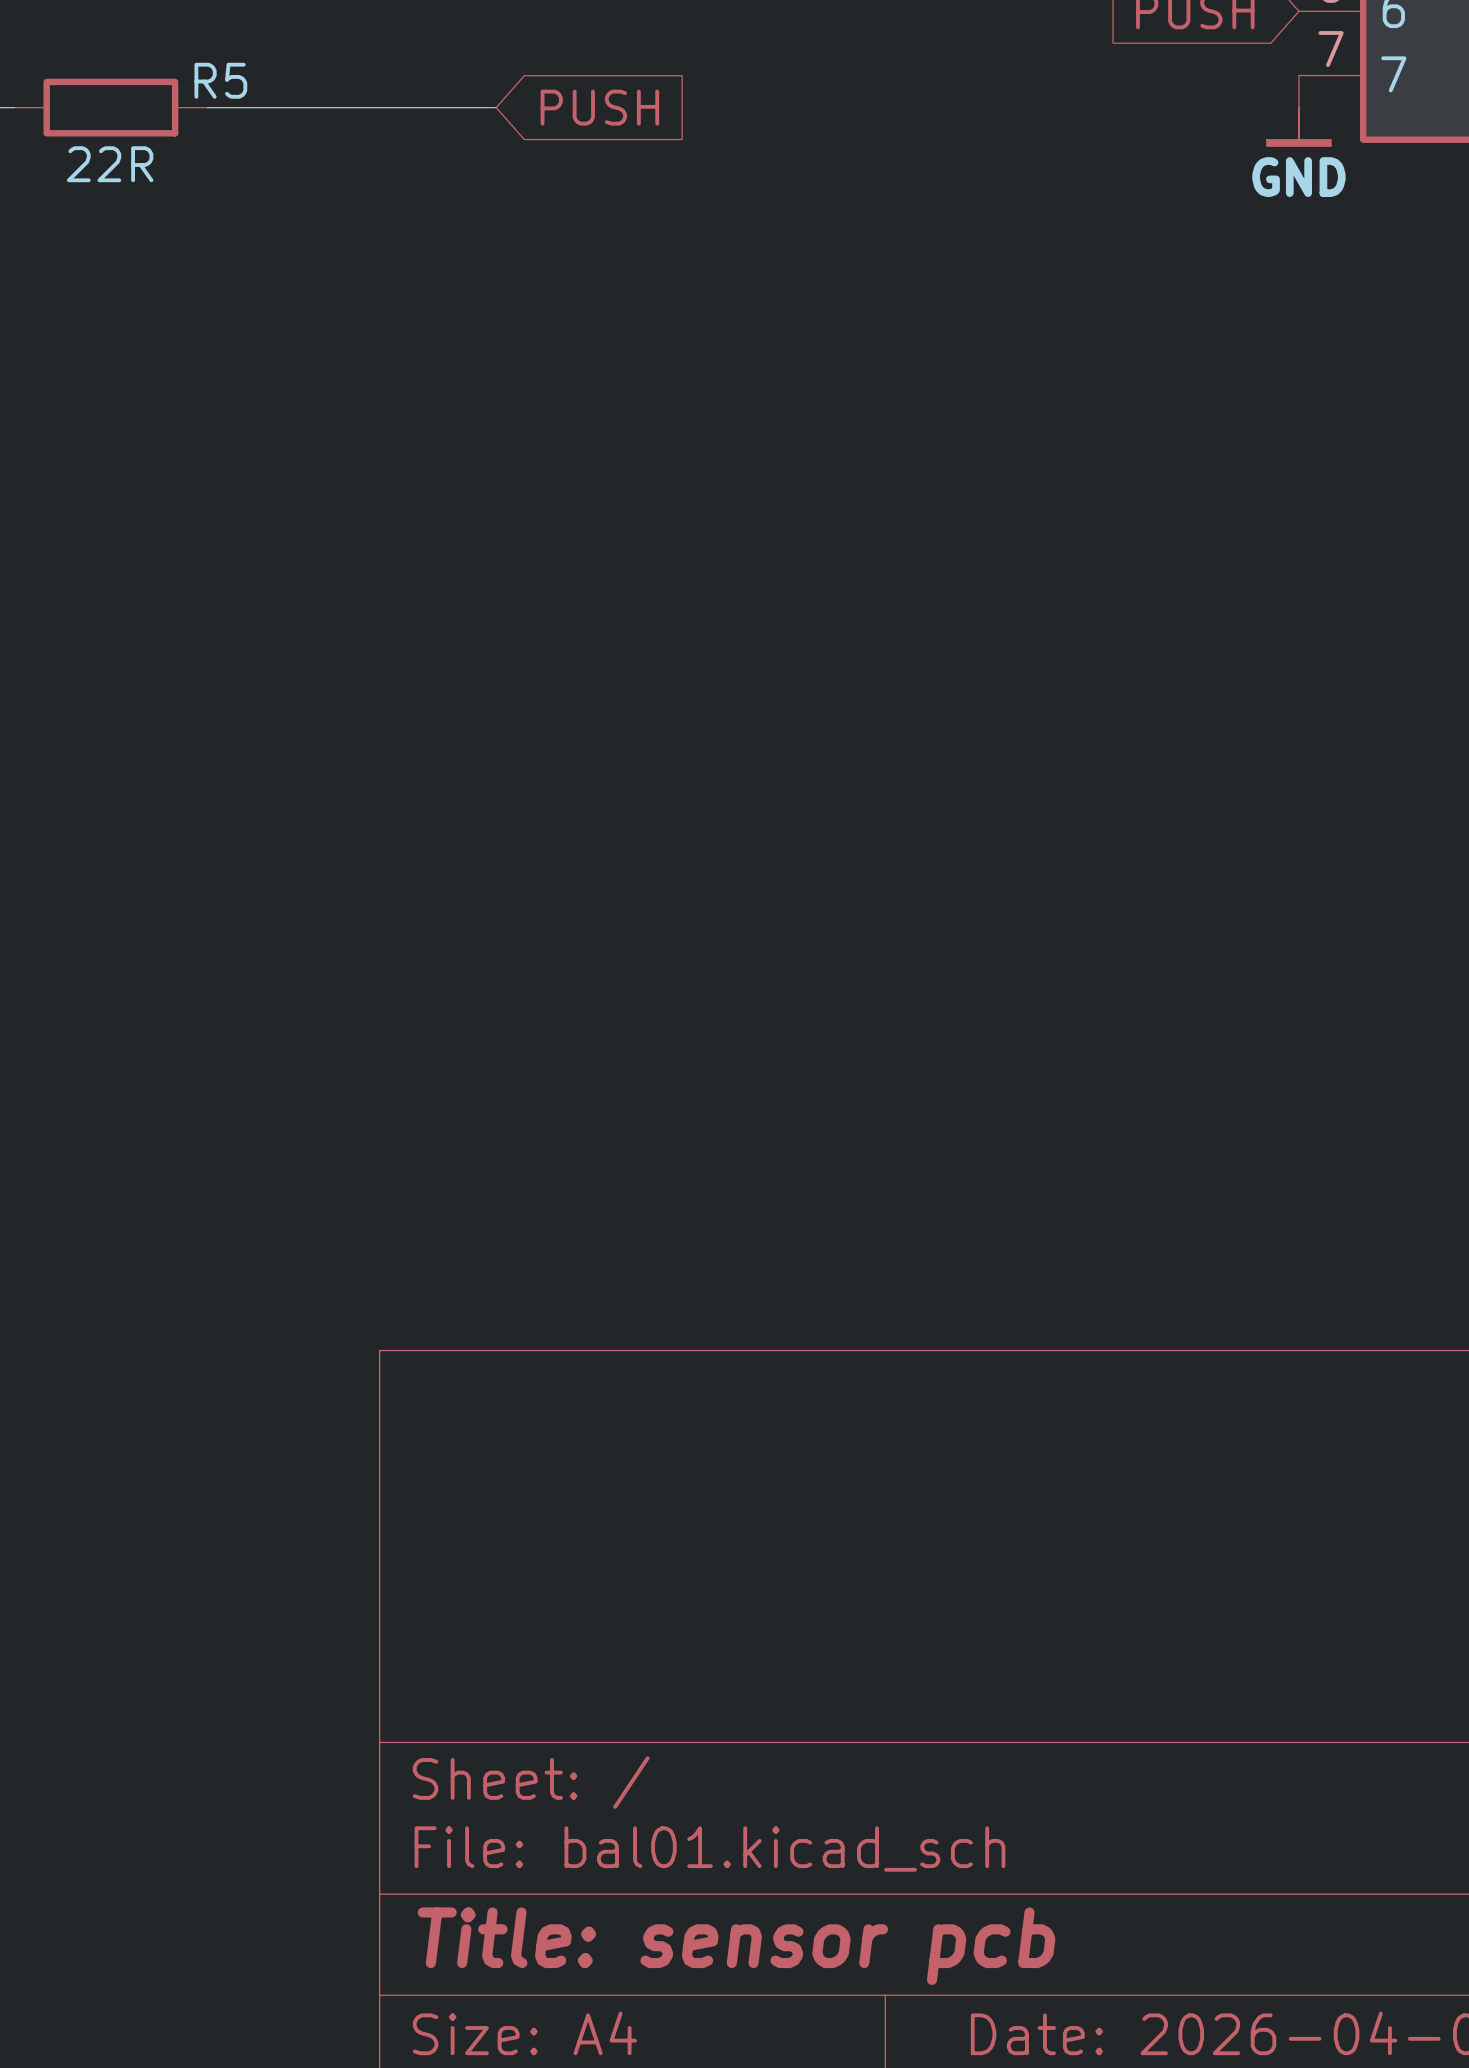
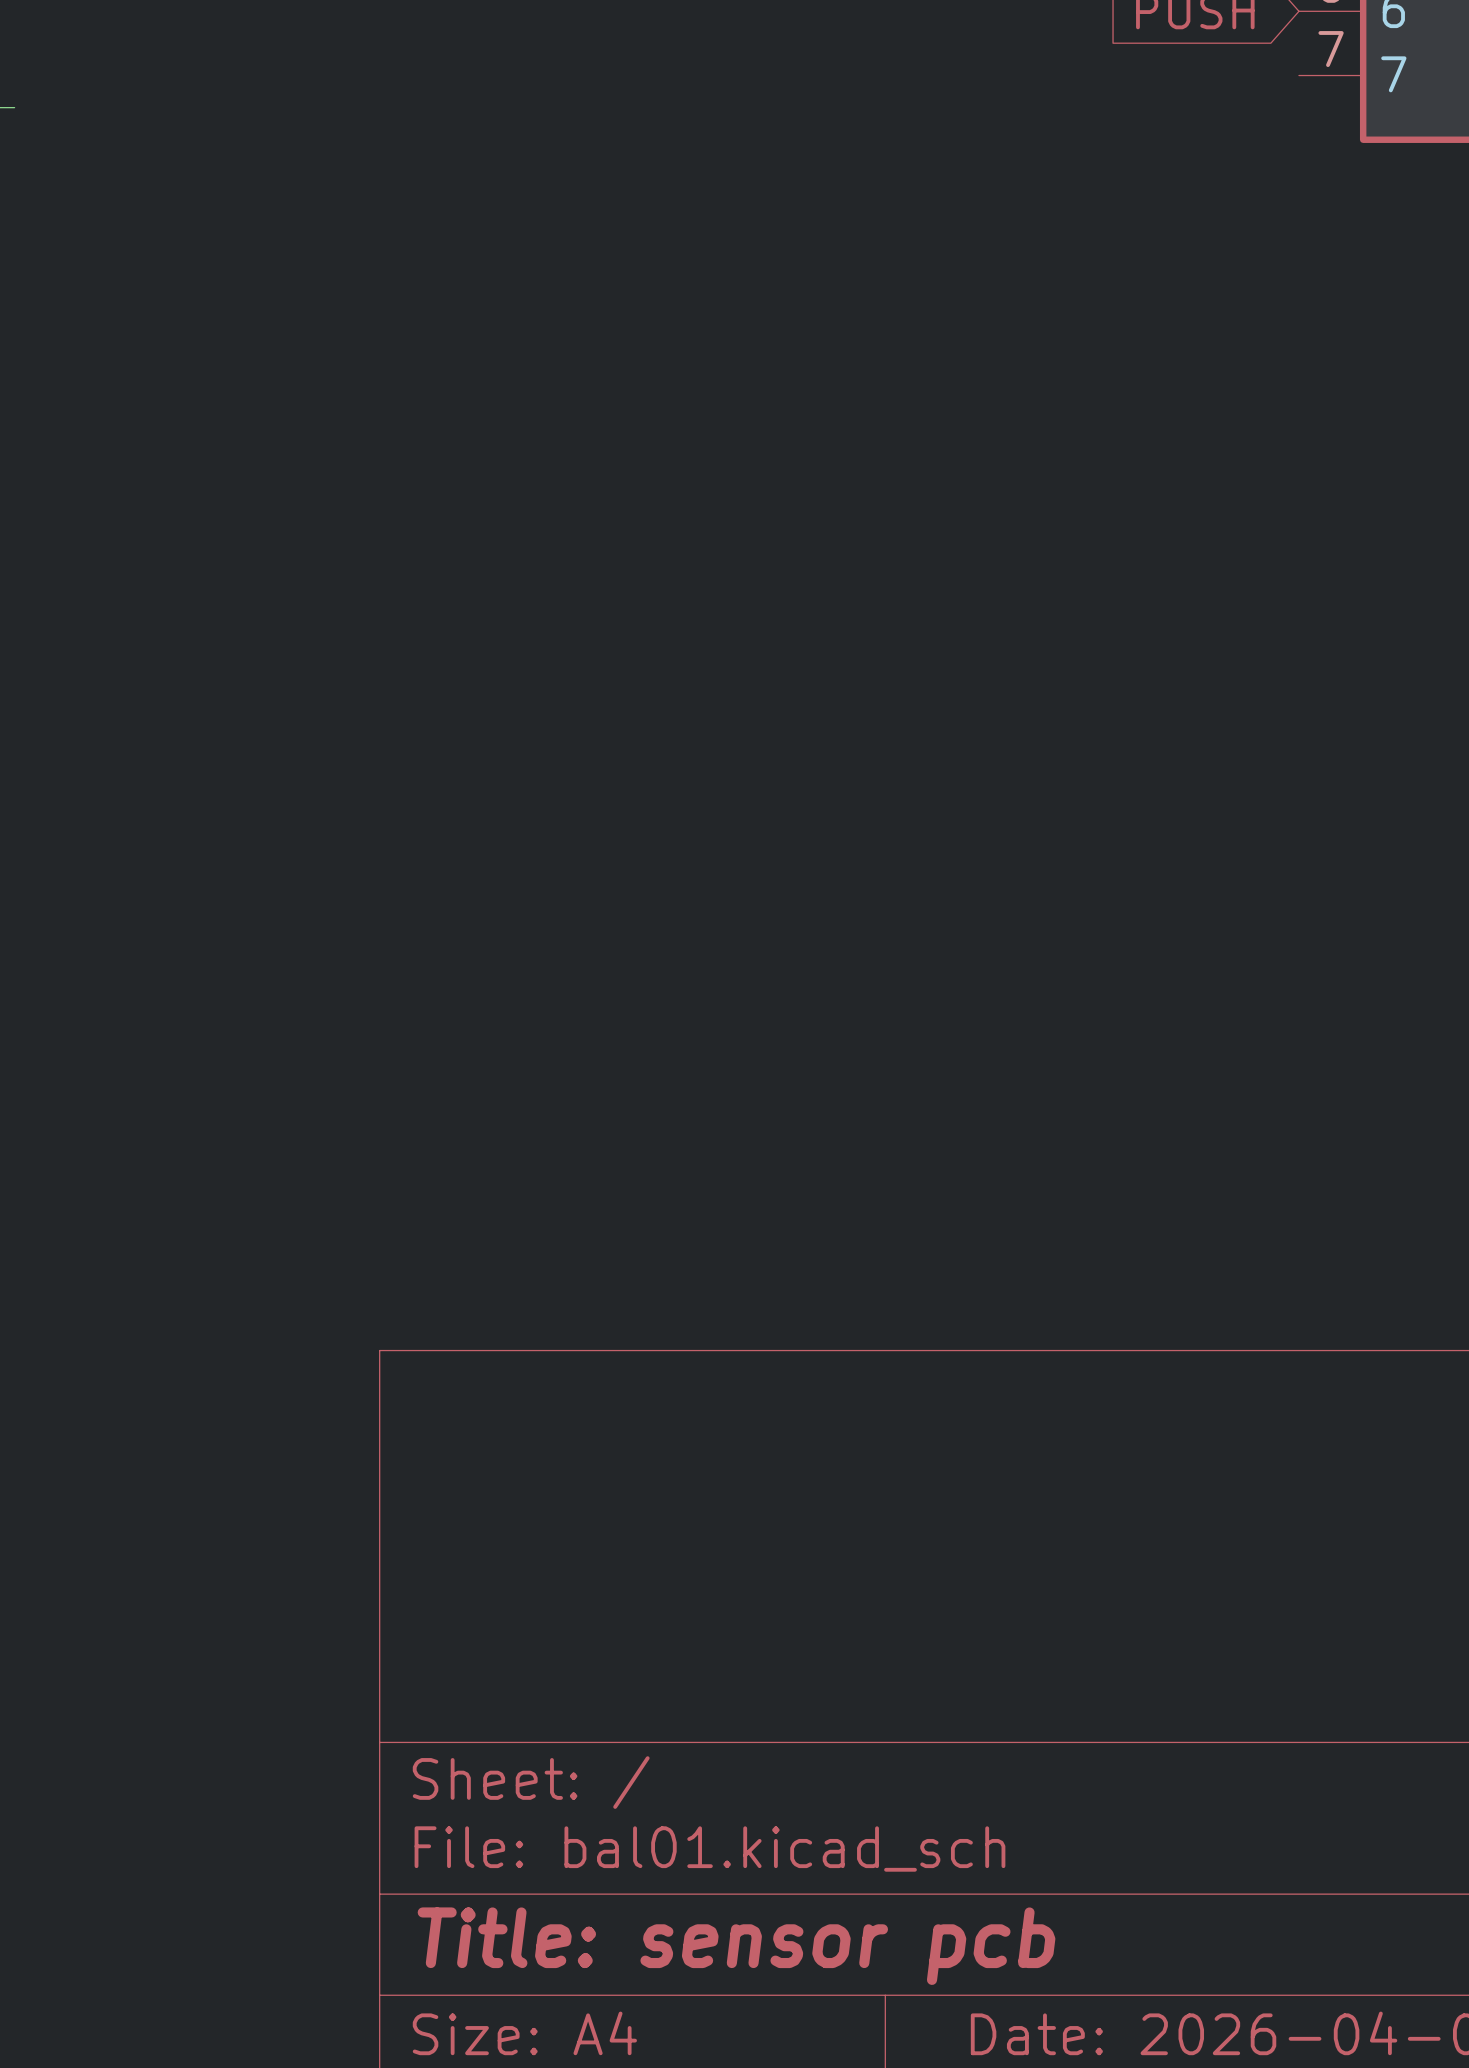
R5: 22R (110, 107) -> none
wire: (207, 107) (496, 107) -> none
global label: PUSH (599, 107) -> none
power symbol: GND (1298, 110) -> none

